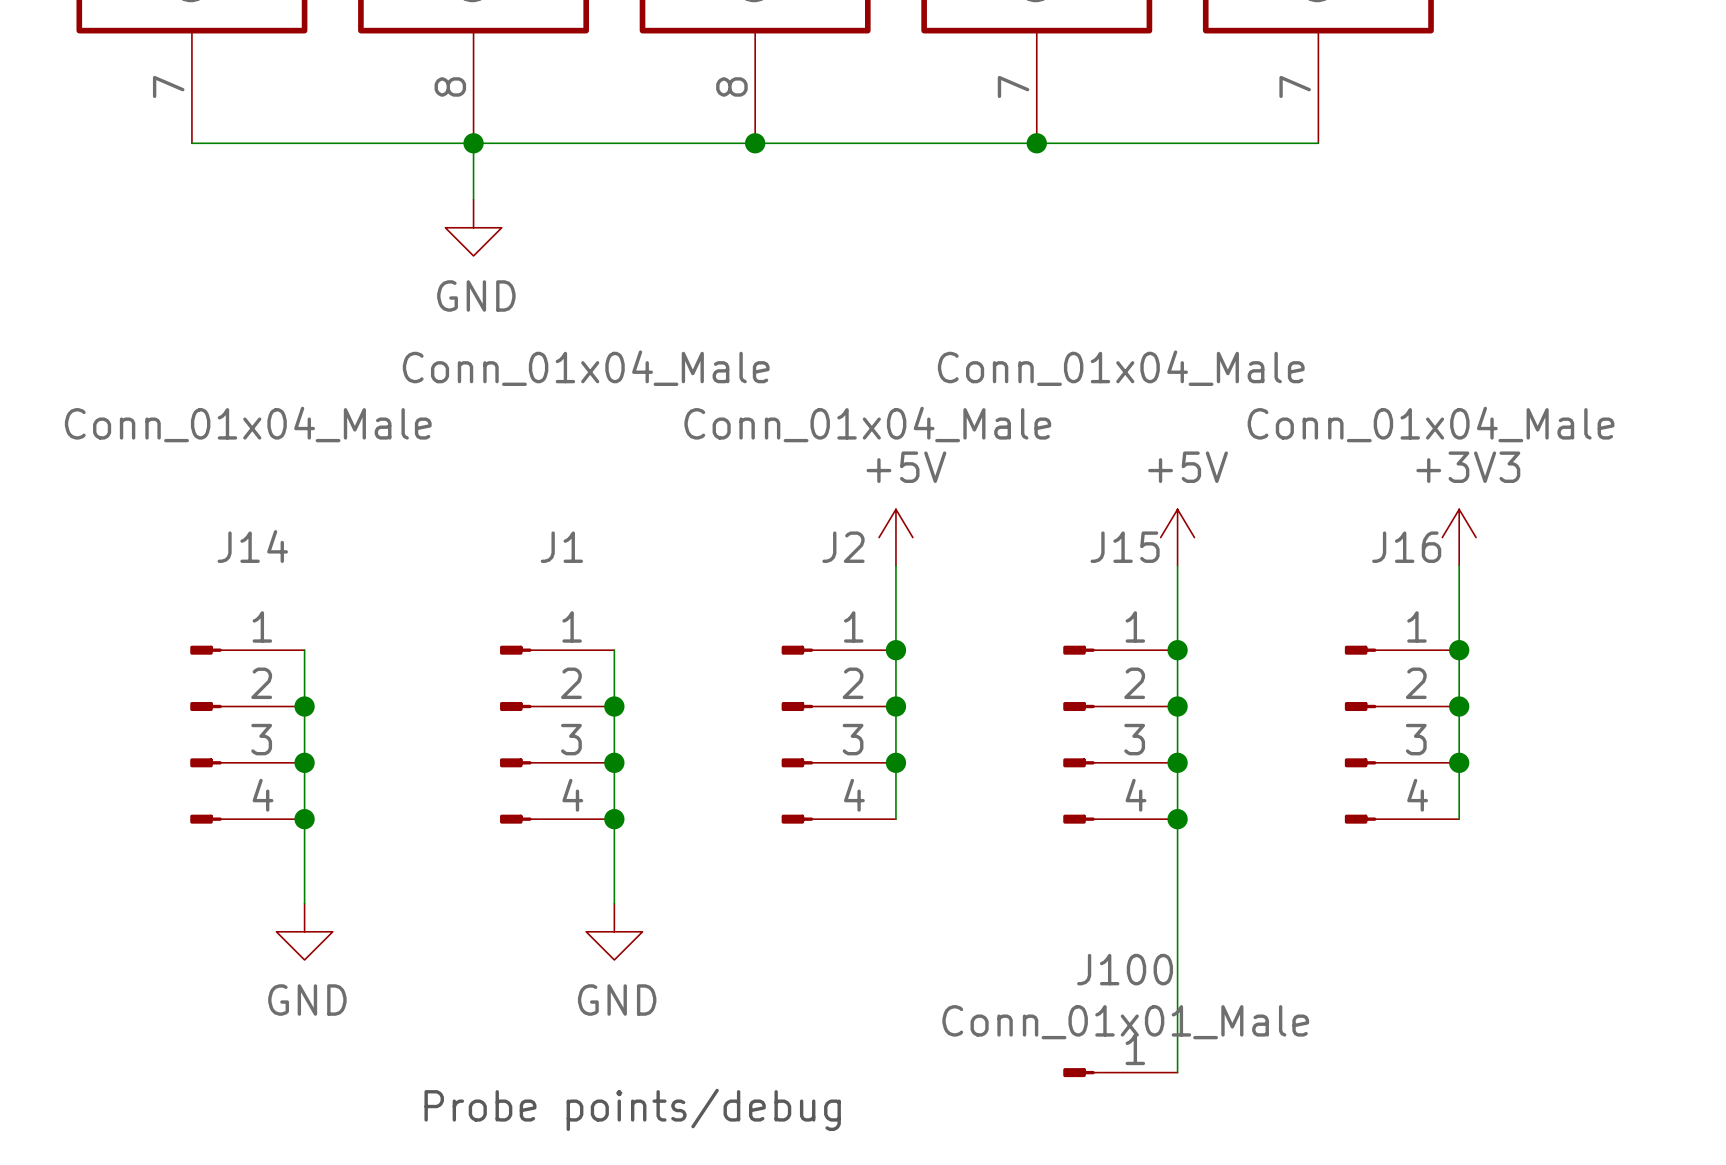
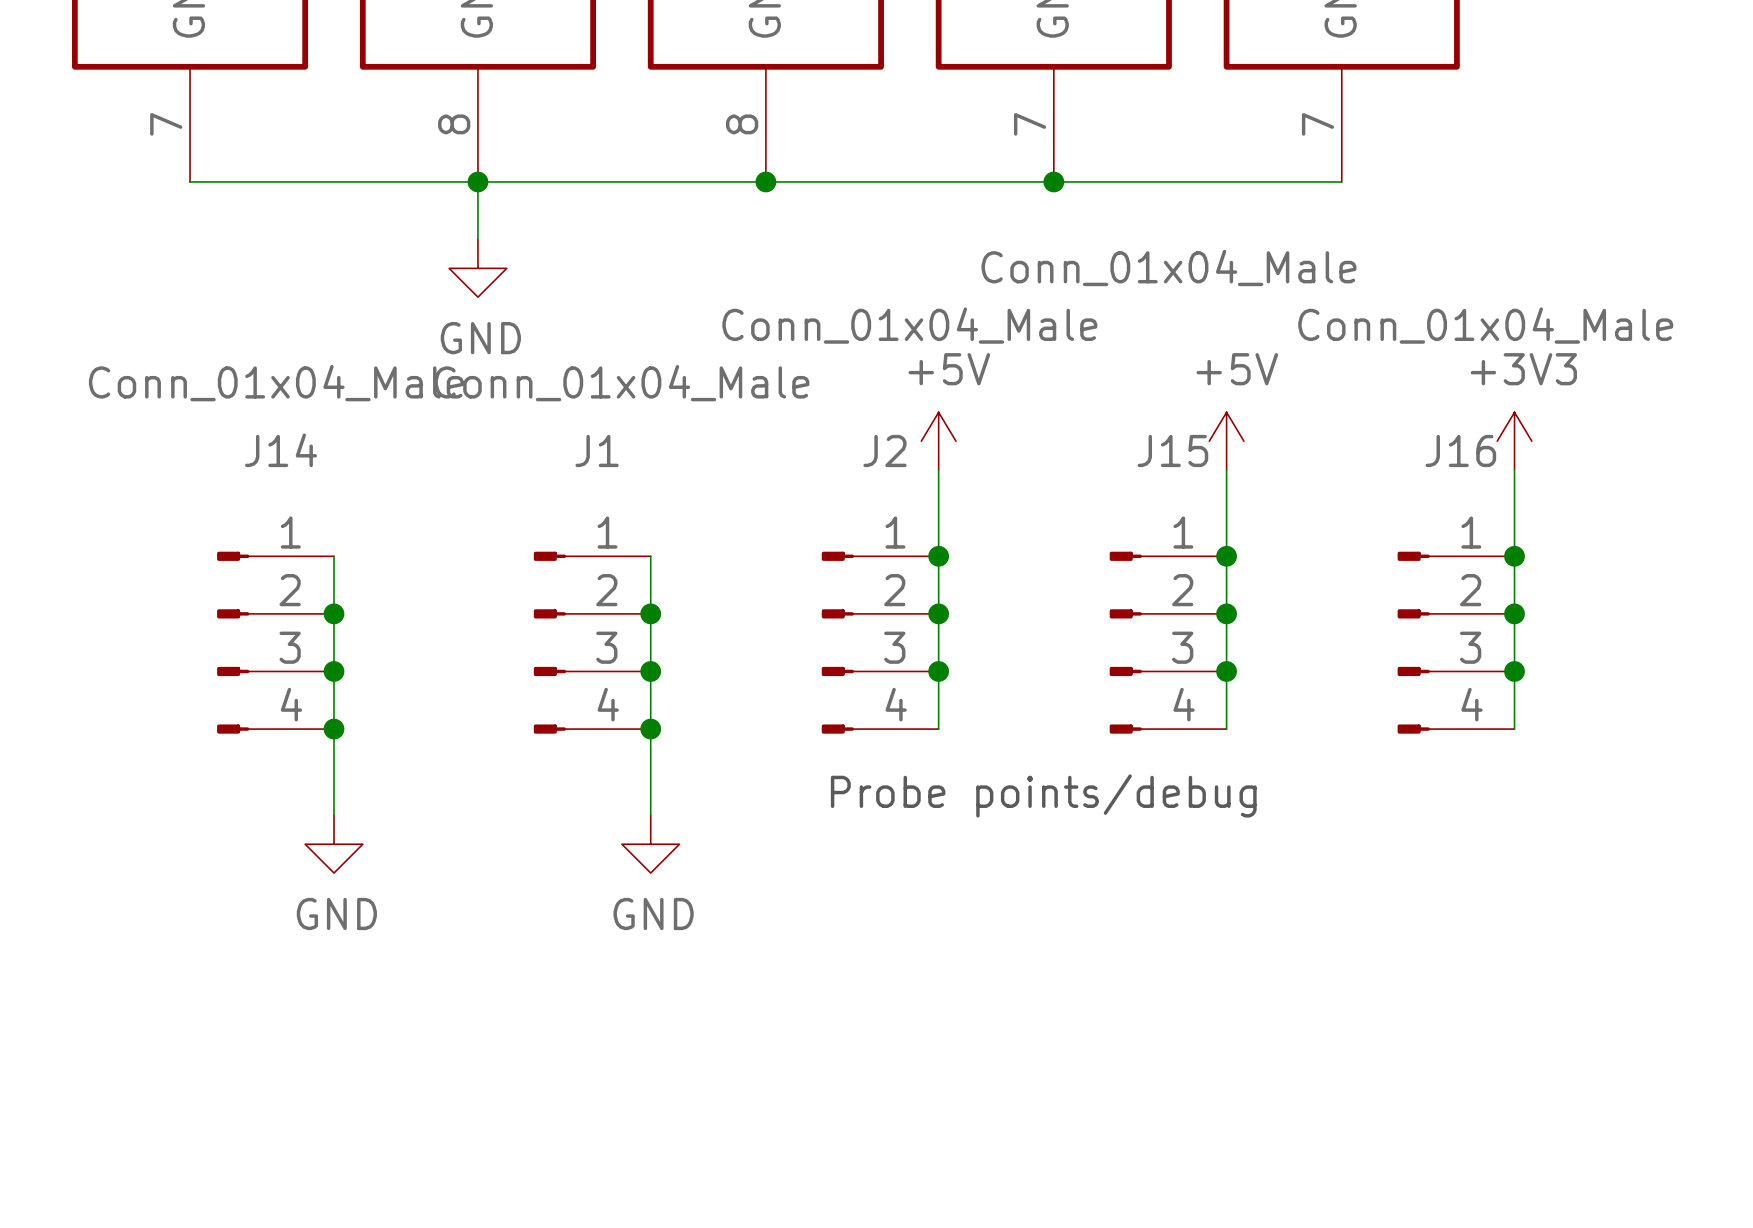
J1 value position: Conn_01x04_Male (586, 368) -> Conn_01x04_Male (621, 383)
J14 value position: Conn_01x04_Male (248, 424) -> Conn_01x04_Male (276, 383)
wire: none -> (1226, 469) (1226, 729)
junction: none -> (938, 556)
junction: none -> (1226, 556)
junction: none -> (1514, 556)
power symbol position: +5V (895, 537) -> +5V (938, 441)
power symbol position: +5V (1177, 537) -> +5V (1226, 441)
power symbol position: +3V3 (1459, 537) -> +3V3 (1514, 441)
junction: none -> (333, 613)
junction: none -> (650, 613)
wire: (895, 565) (895, 819) -> (938, 469) (938, 729)
junction: none -> (938, 613)
wire: (1177, 565) (1177, 1072) -> none
junction: none -> (1226, 613)
wire: (1459, 565) (1459, 819) -> (1514, 469) (1514, 729)
junction: none -> (1514, 613)
junction: none -> (333, 671)
junction: none -> (650, 671)
wire: (304, 650) (304, 903) -> (333, 556) (333, 815)
wire: (614, 650) (614, 903) -> (650, 556) (650, 815)
junction position: (895, 650) -> (938, 671)
junction position: (1177, 650) -> (1226, 671)
junction position: (1459, 650) -> (1514, 671)
junction position: (304, 706) -> (333, 729)
junction position: (614, 706) -> (650, 729)
junction: (895, 706) -> none
junction: (1177, 706) -> none
junction: (1459, 706) -> none
J14 position: (247, 734) -> (275, 642)
J1 position: (557, 734) -> (592, 642)
J2 position: (838, 734) -> (880, 642)
J15 position: (1120, 734) -> (1168, 642)
J16 position: (1402, 734) -> (1456, 642)
junction: (304, 762) -> none
junction: (614, 762) -> none
junction: (895, 762) -> none
junction: (1177, 762) -> none
junction: (1459, 762) -> none
junction: (304, 819) -> none
junction: (614, 819) -> none
junction: (1177, 819) -> none
power symbol position: GND (304, 931) -> GND (333, 844)
power symbol position: GND (614, 931) -> GND (650, 844)
J100: Conn_01x01_Male (1120, 1072) -> none
text position: Probe points/debug (632, 1109) -> Probe points/debug (1043, 795)

